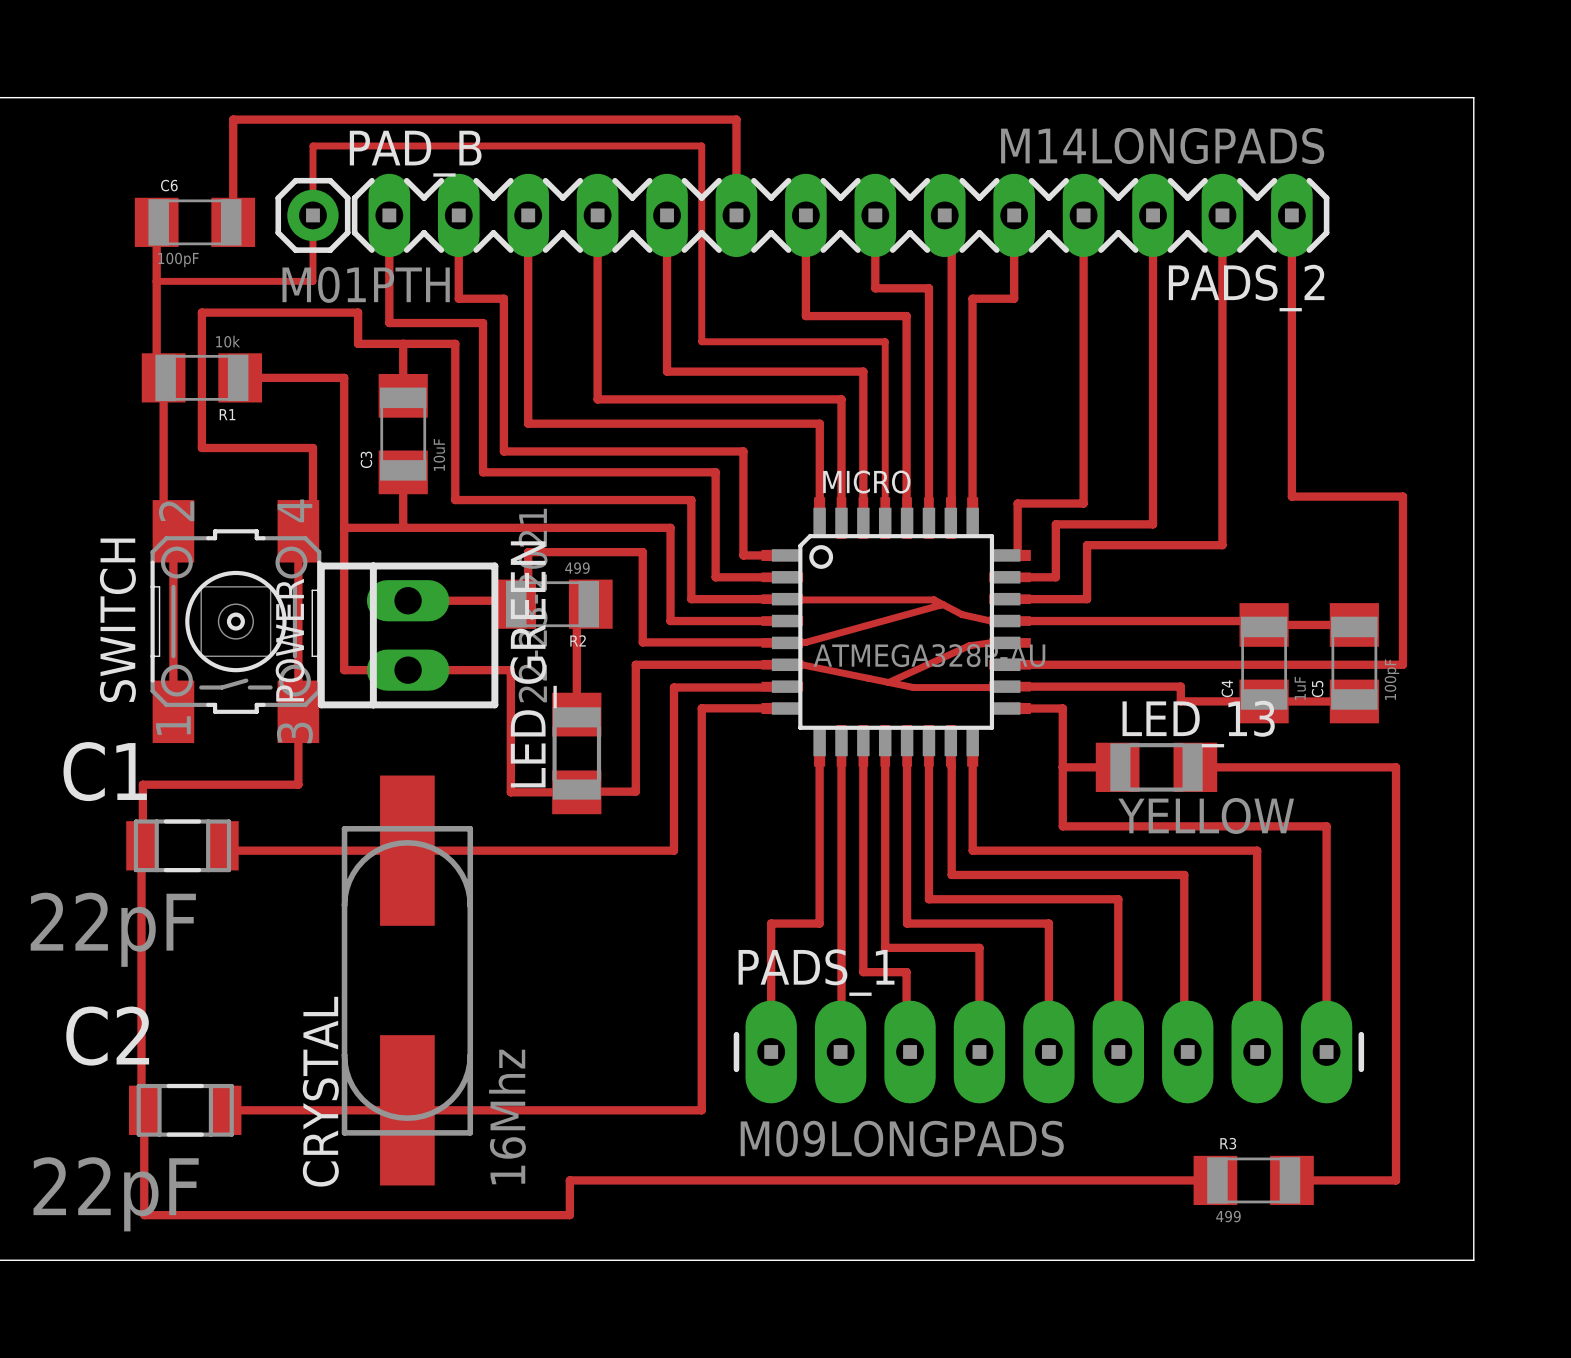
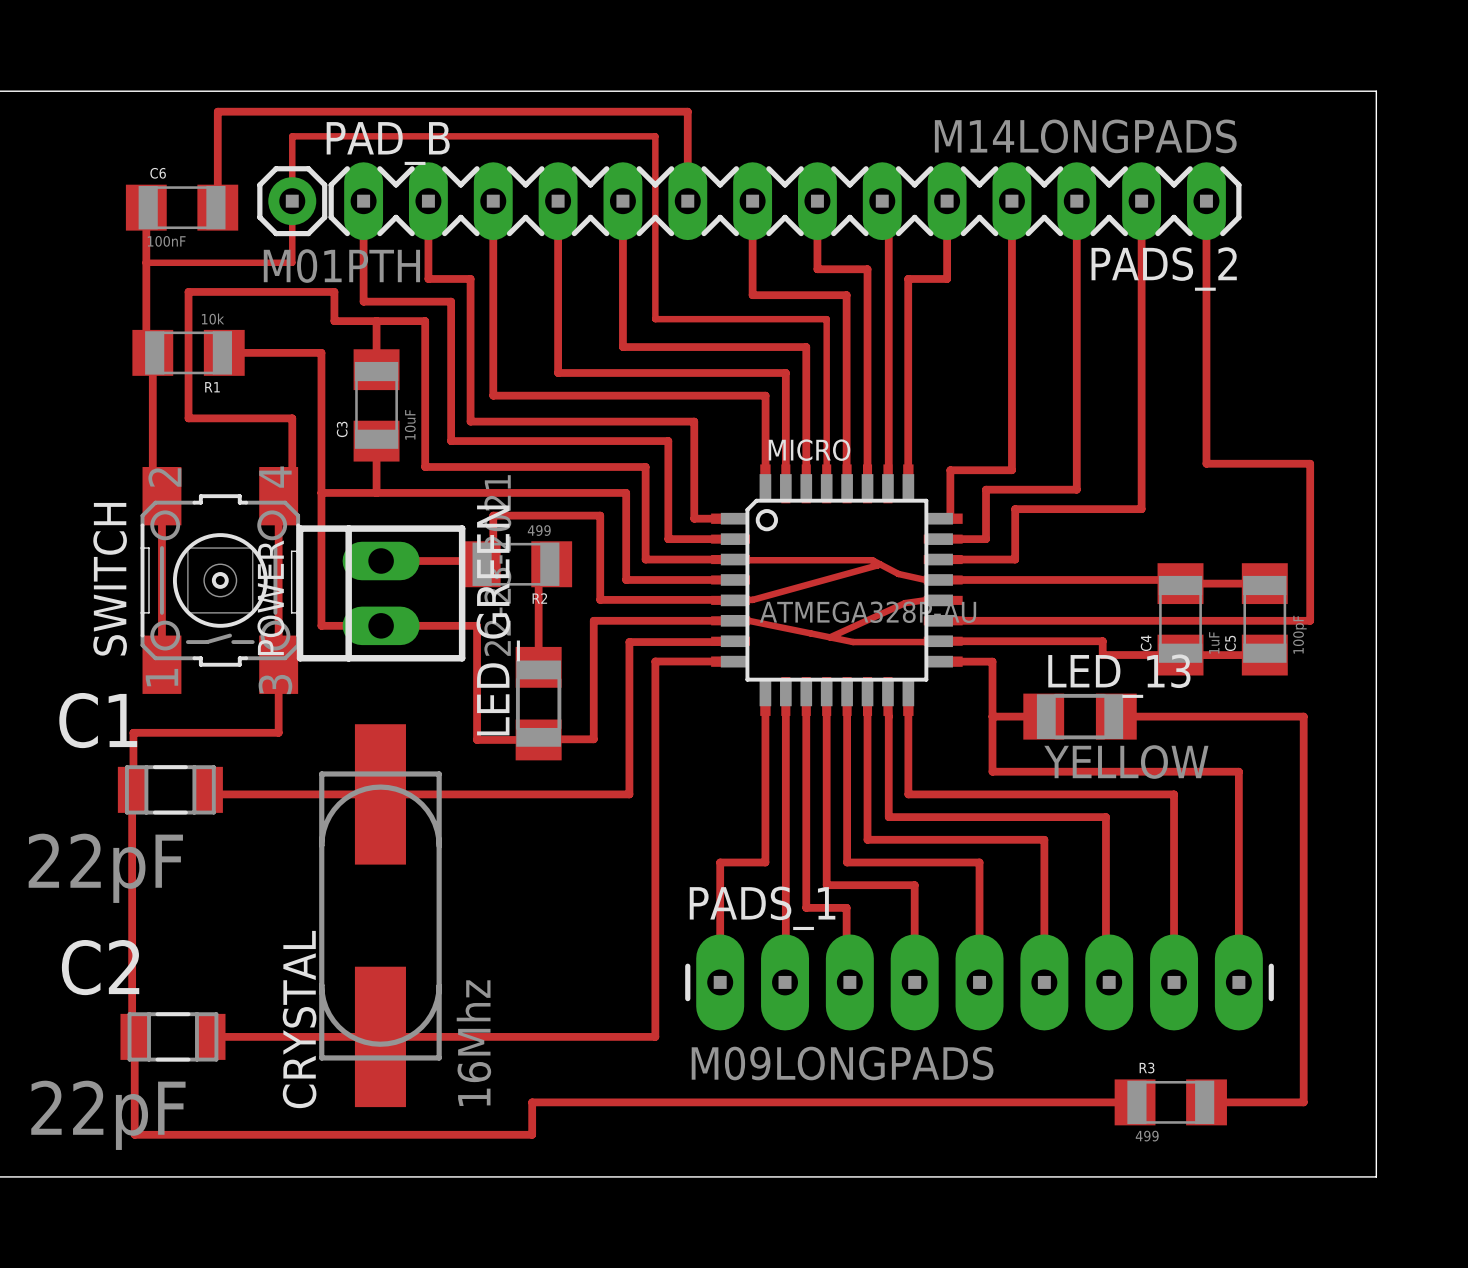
C6 value: 100pF (178, 259) -> 100nF (166, 241)

